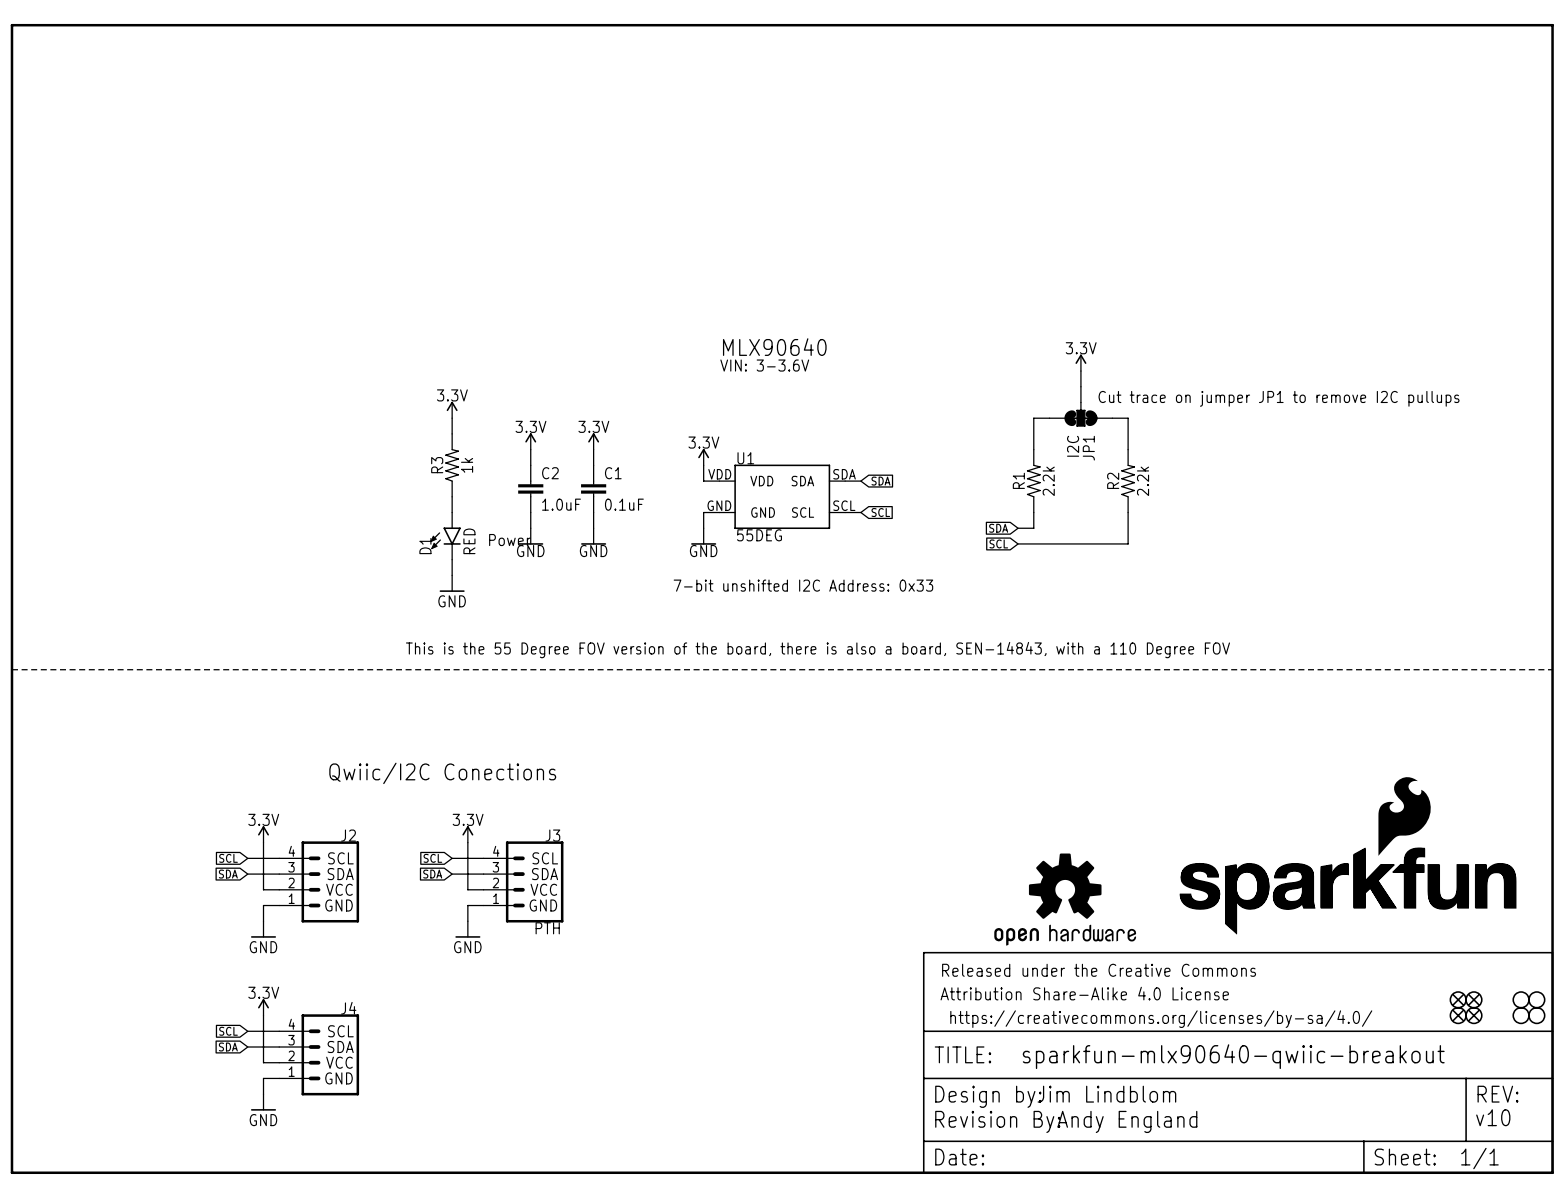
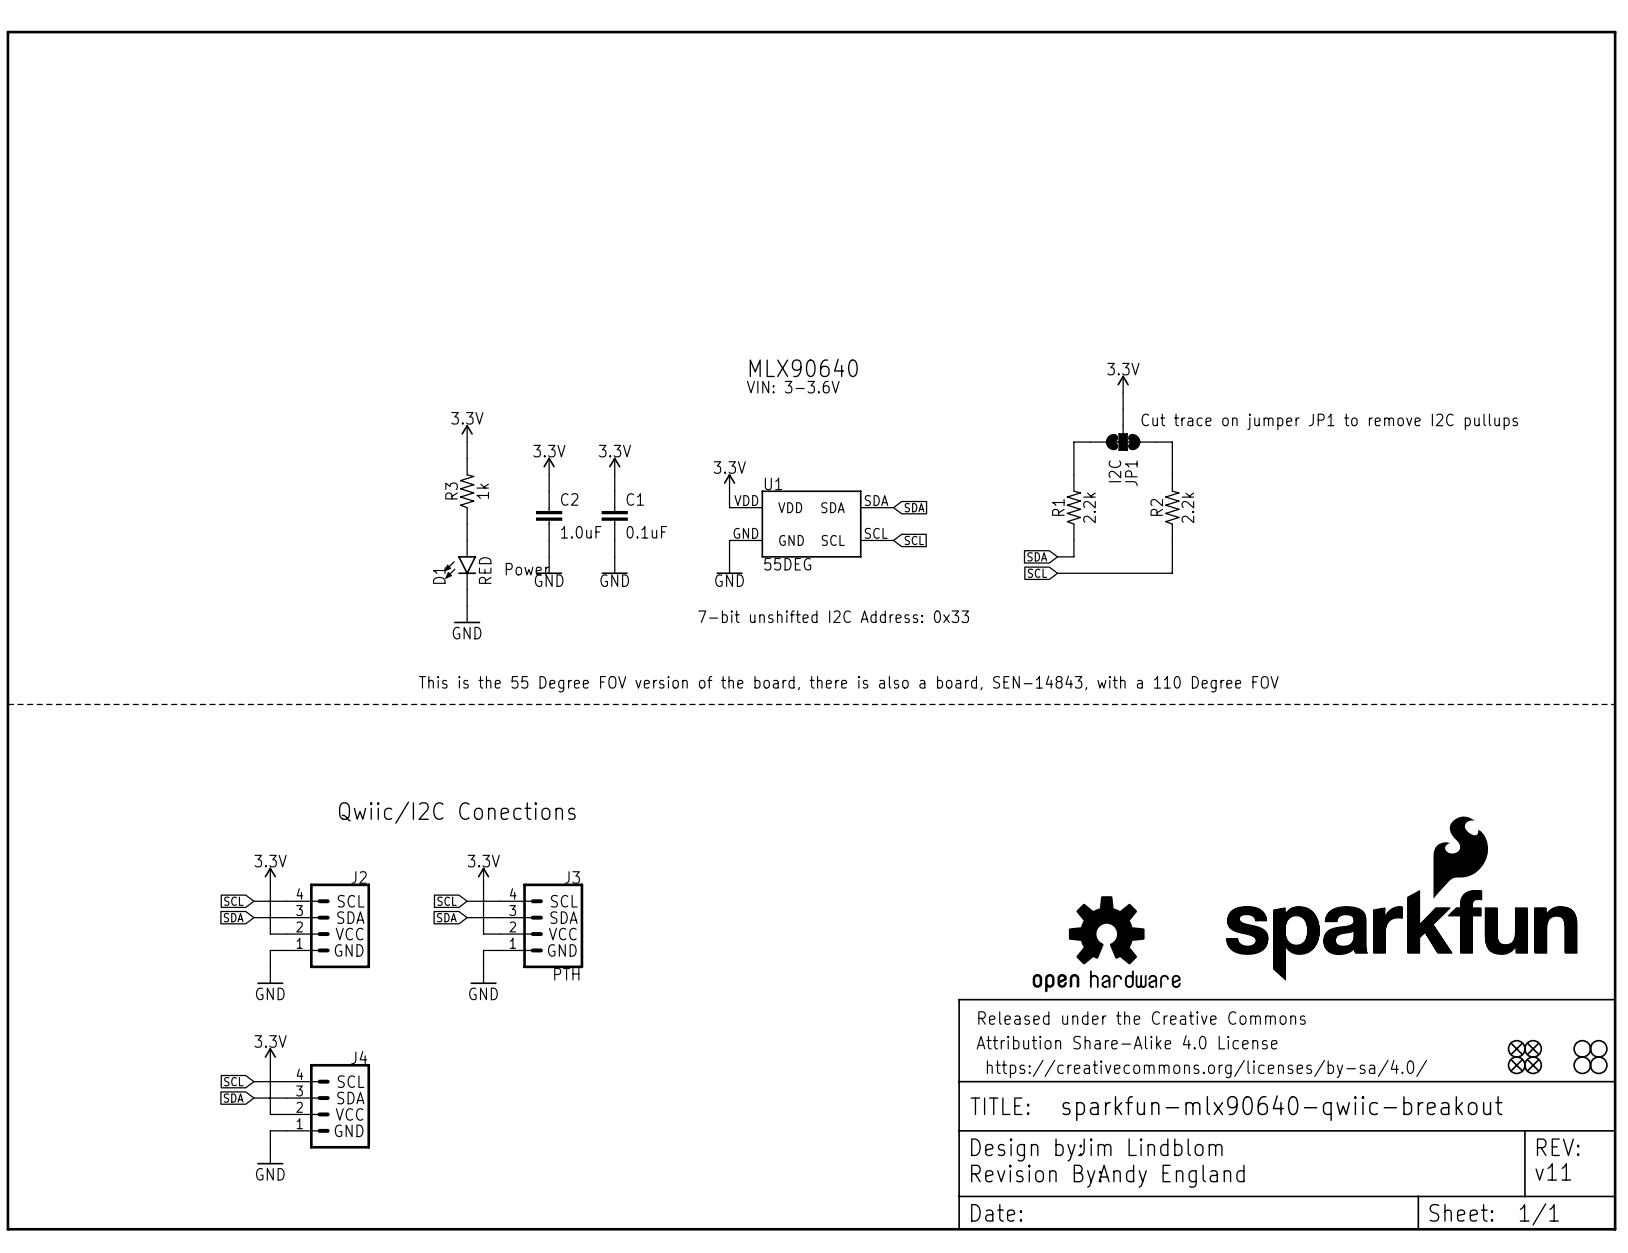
text: v10 (1493, 1117) -> v11 (1553, 1171)

